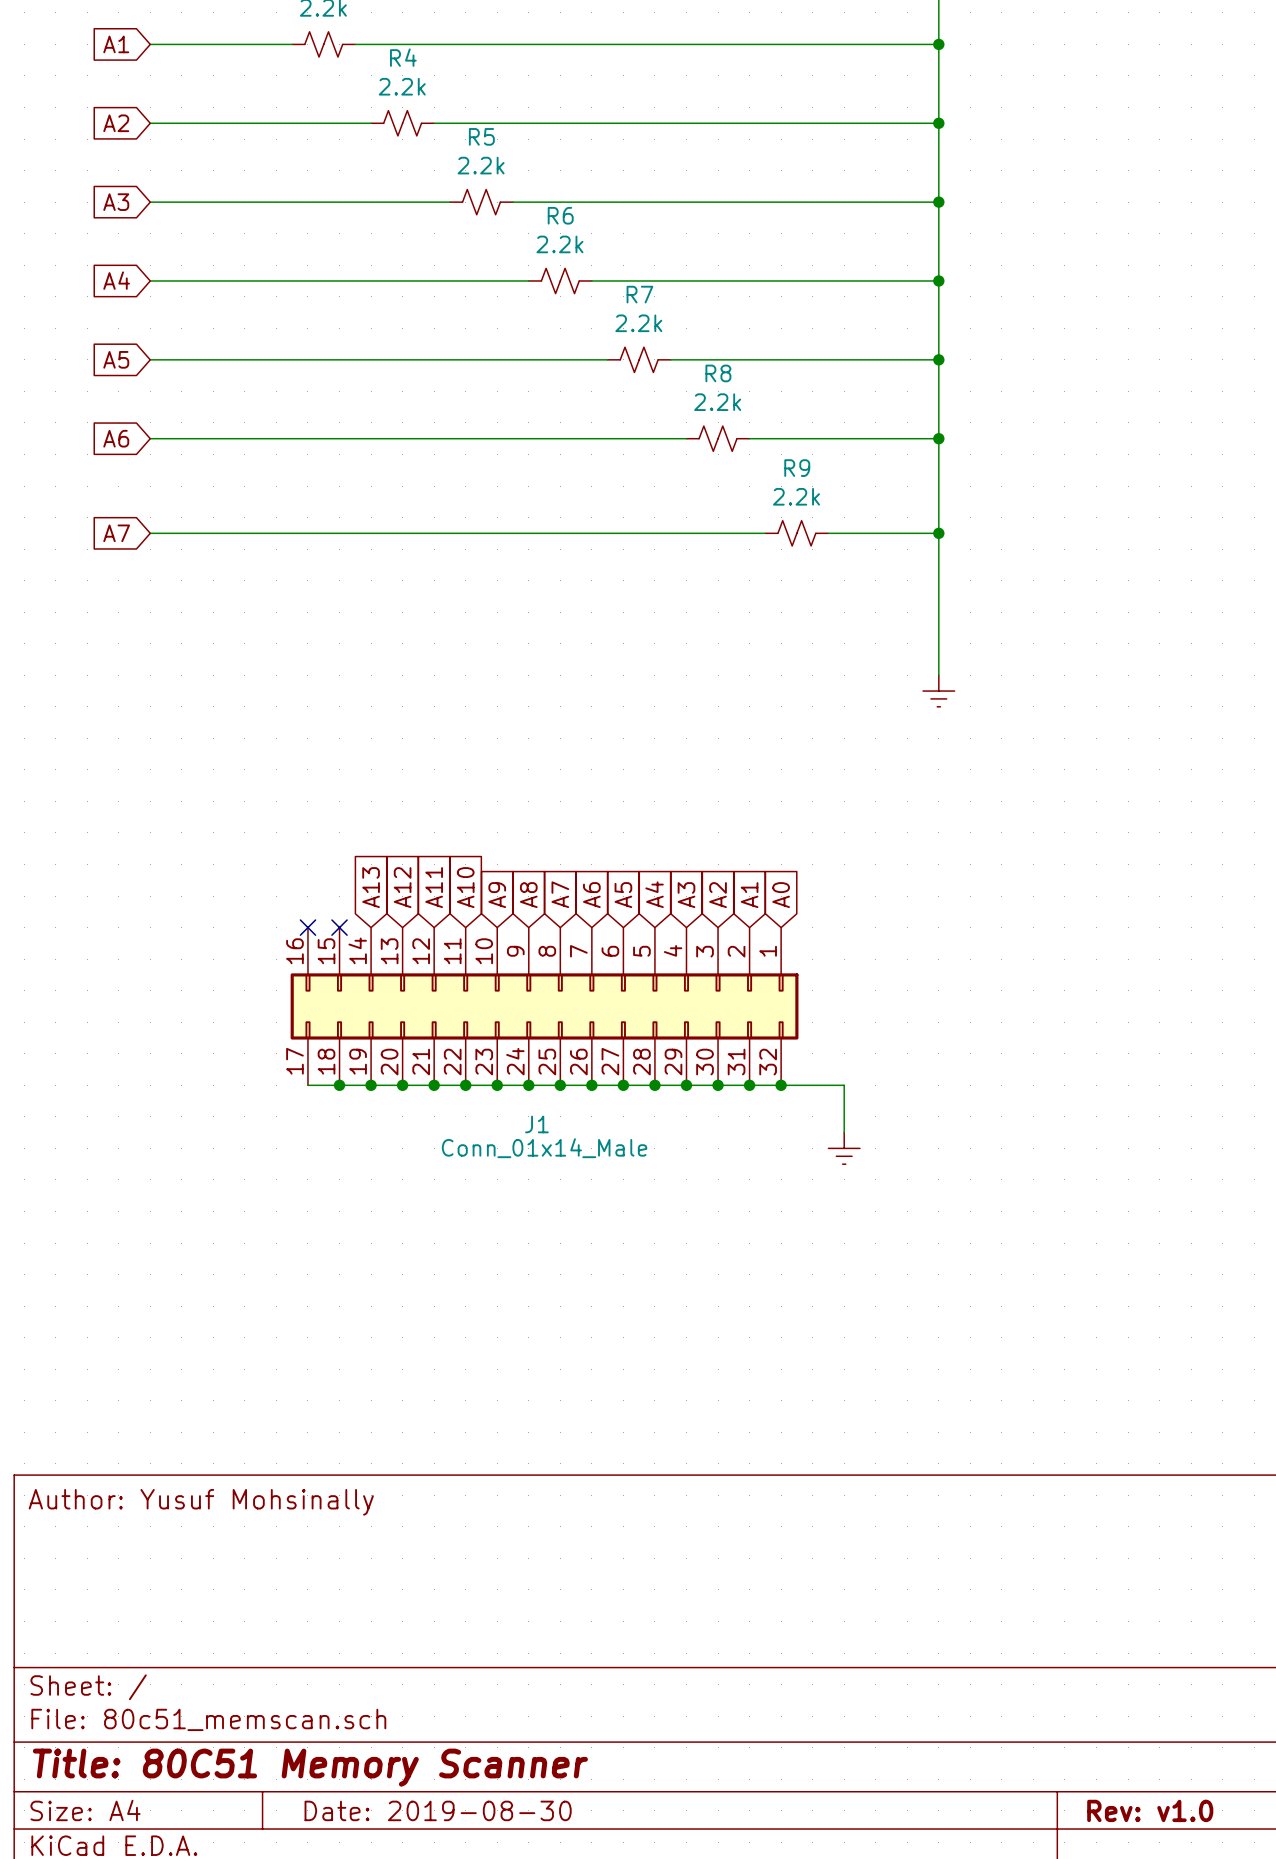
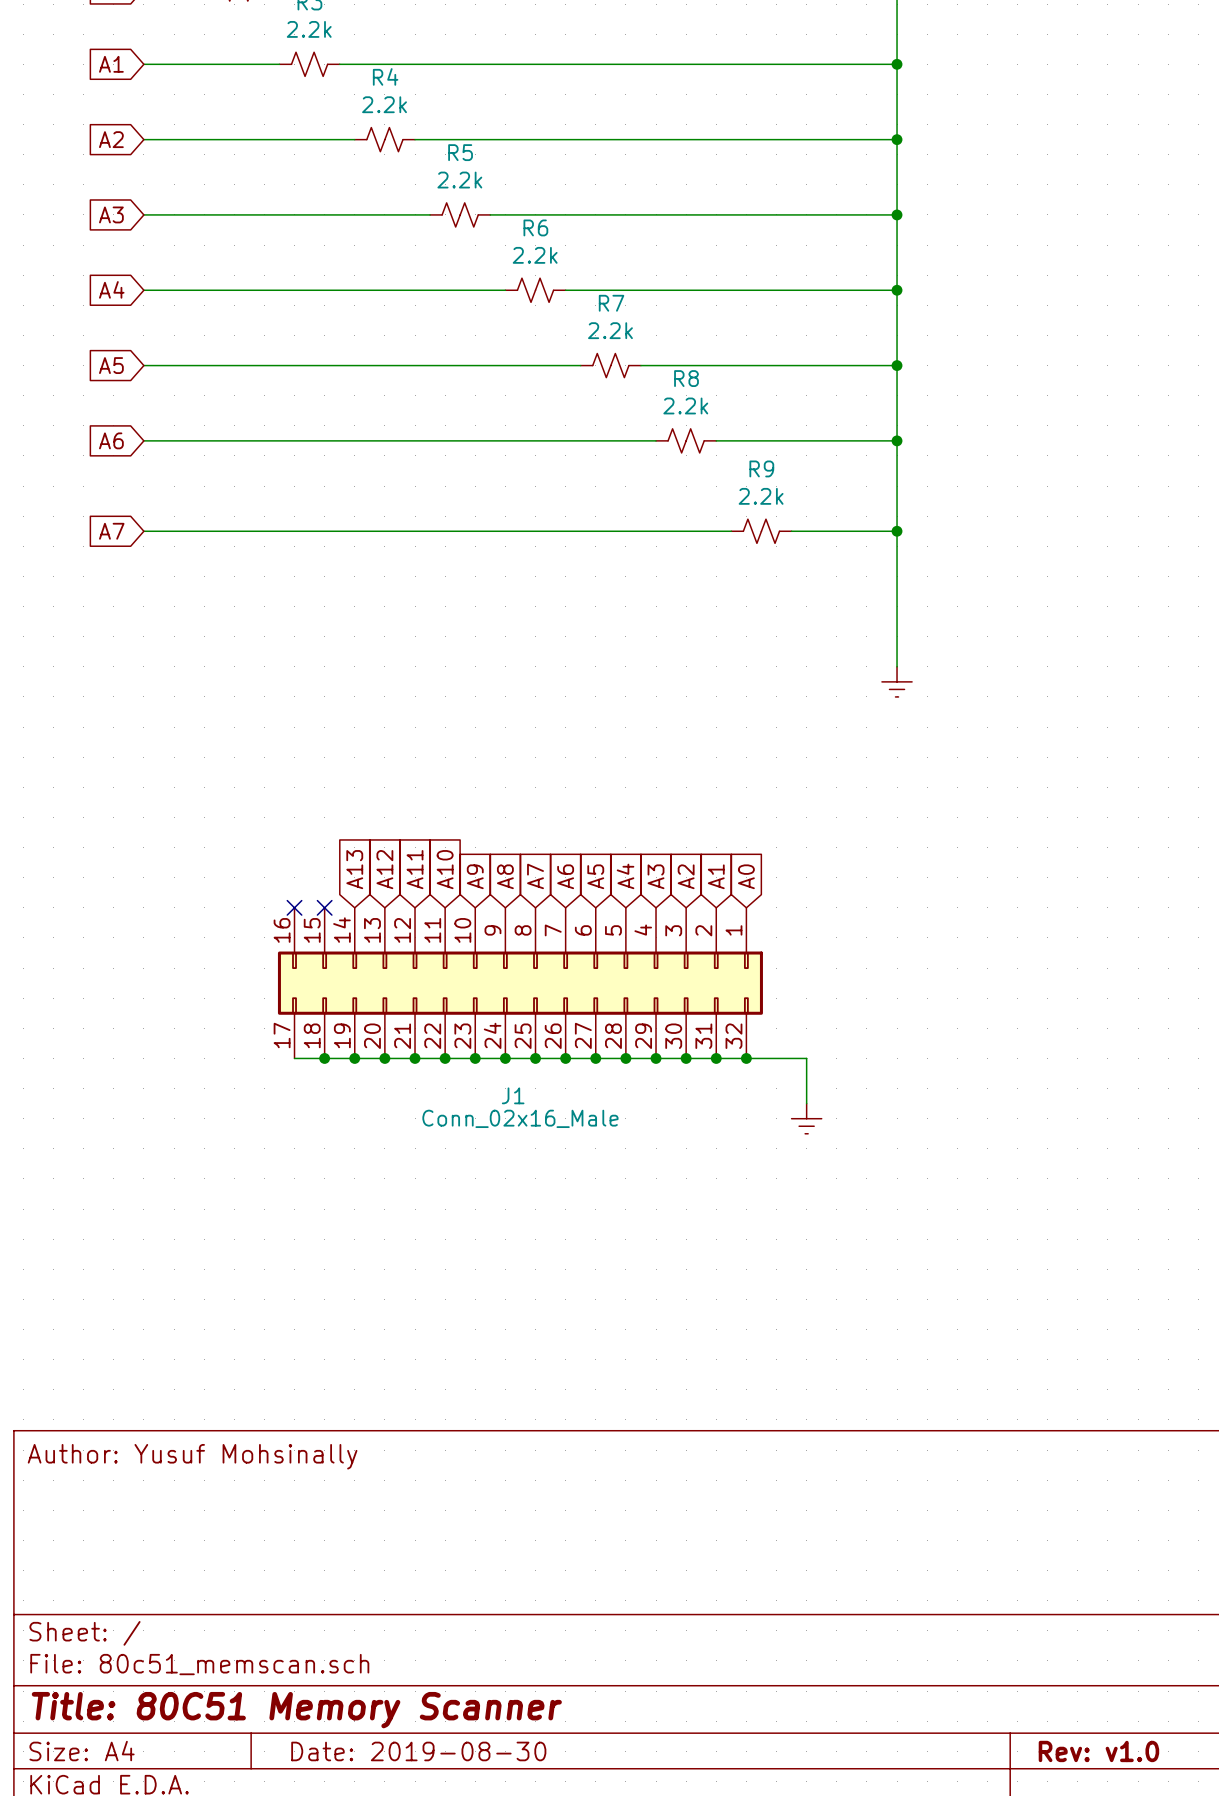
J1 value: Conn_01x14_Male (544, 1148) -> Conn_02x16_Male (520, 1118)

